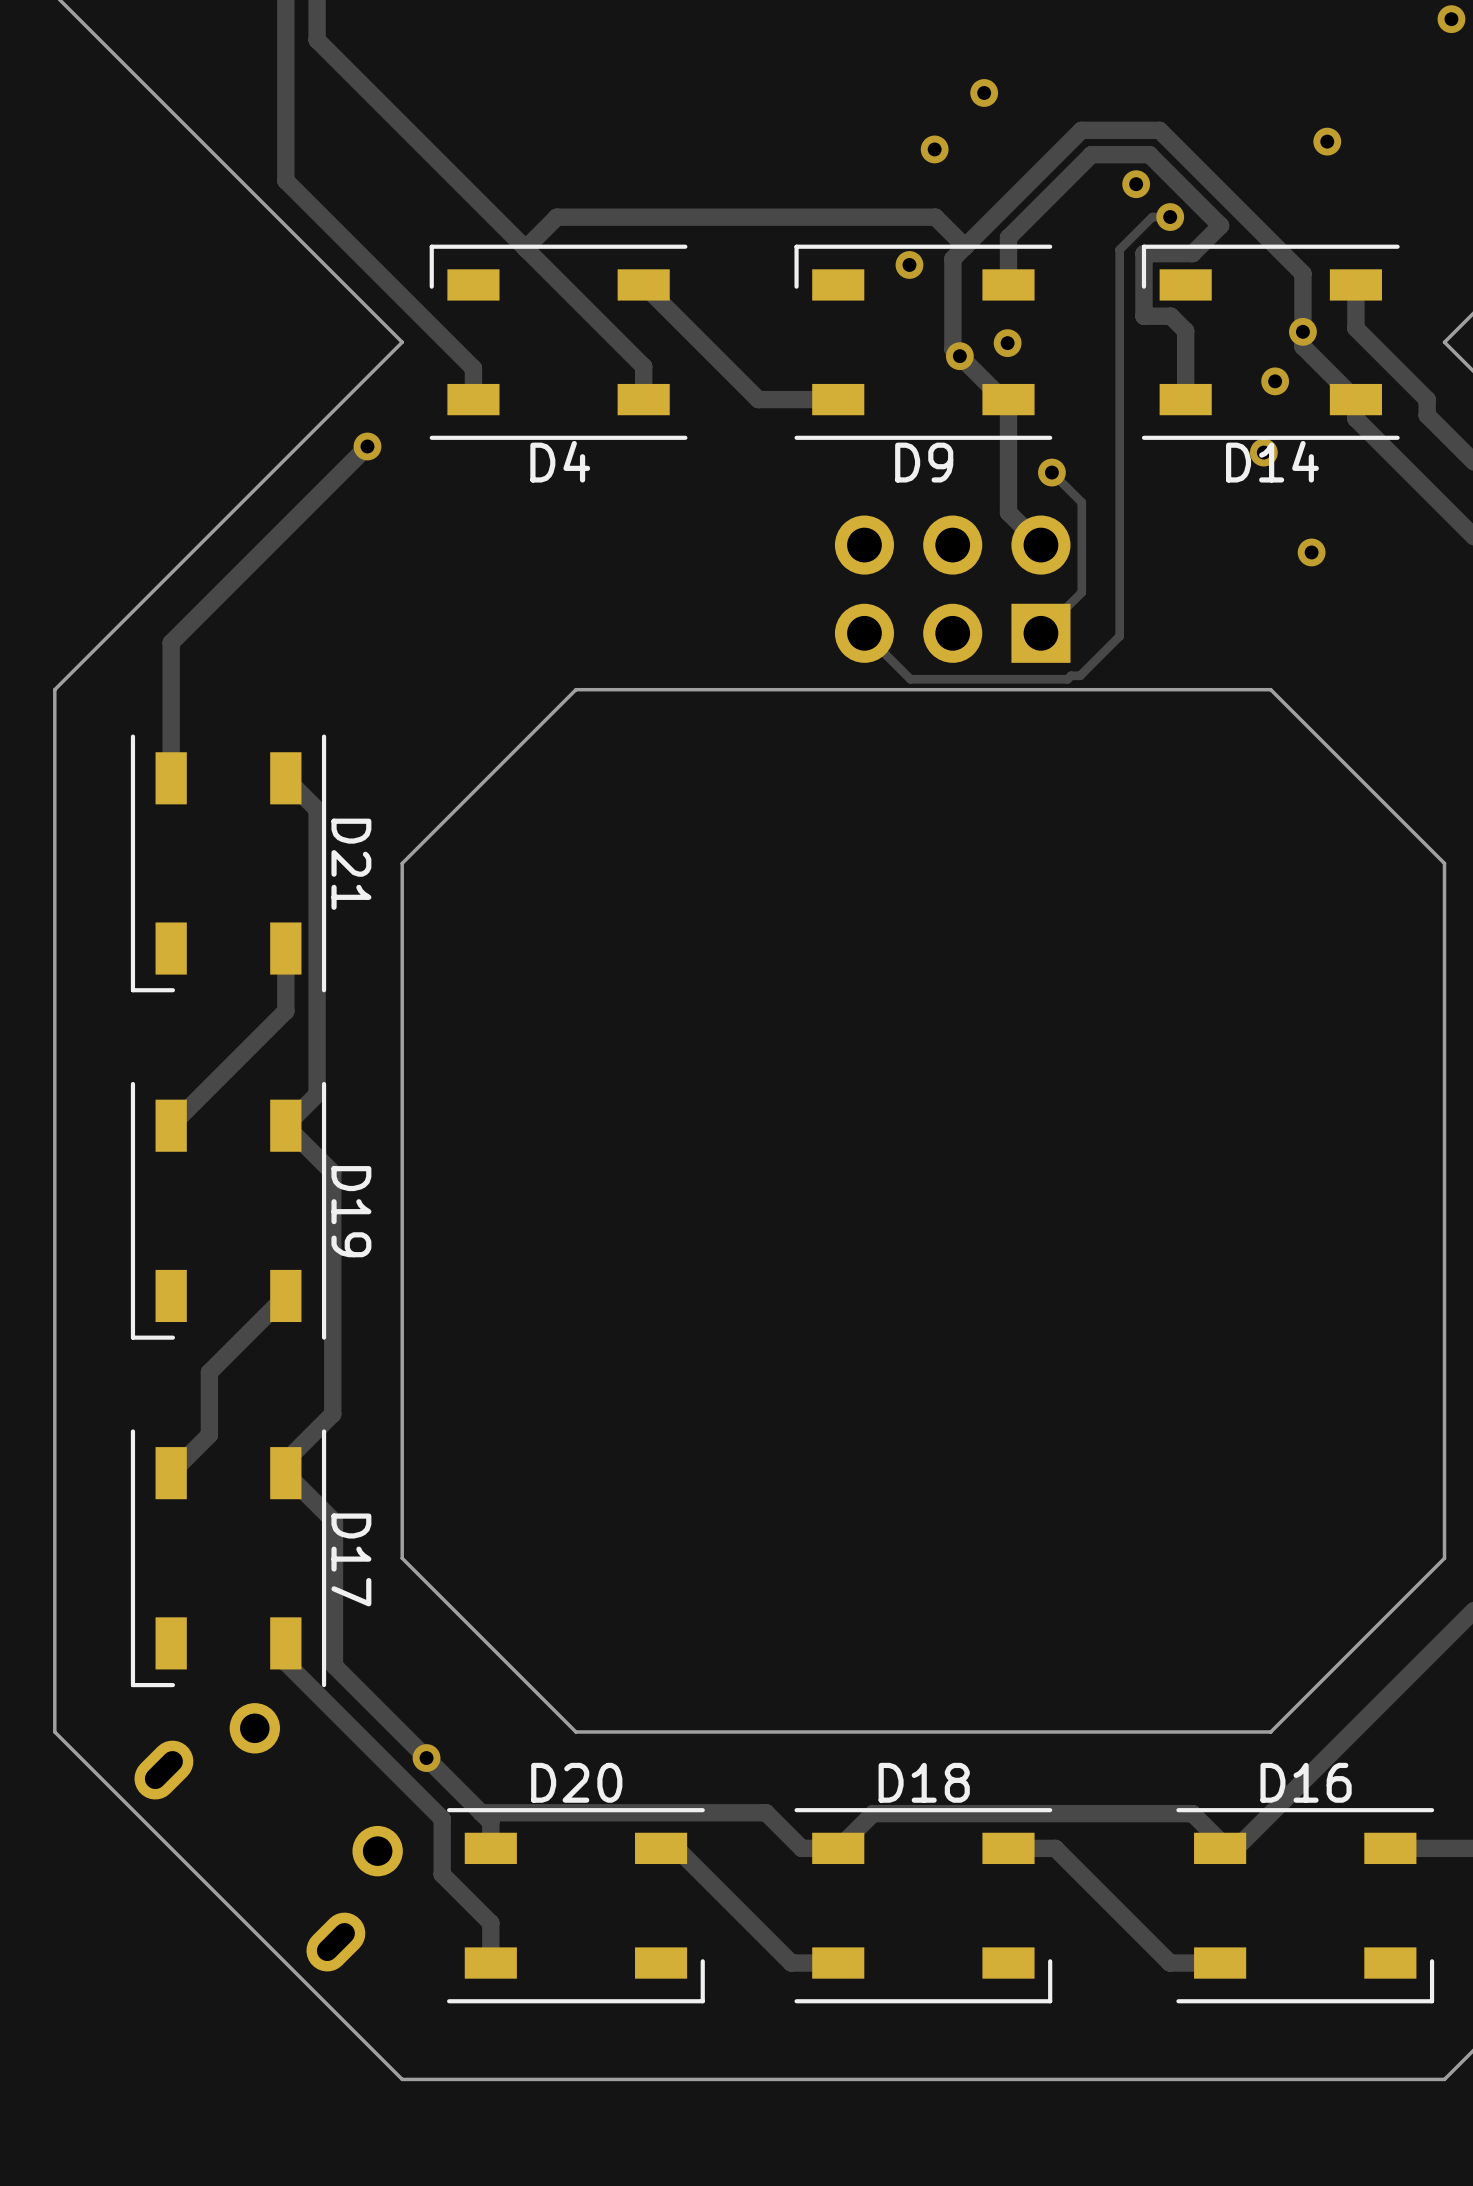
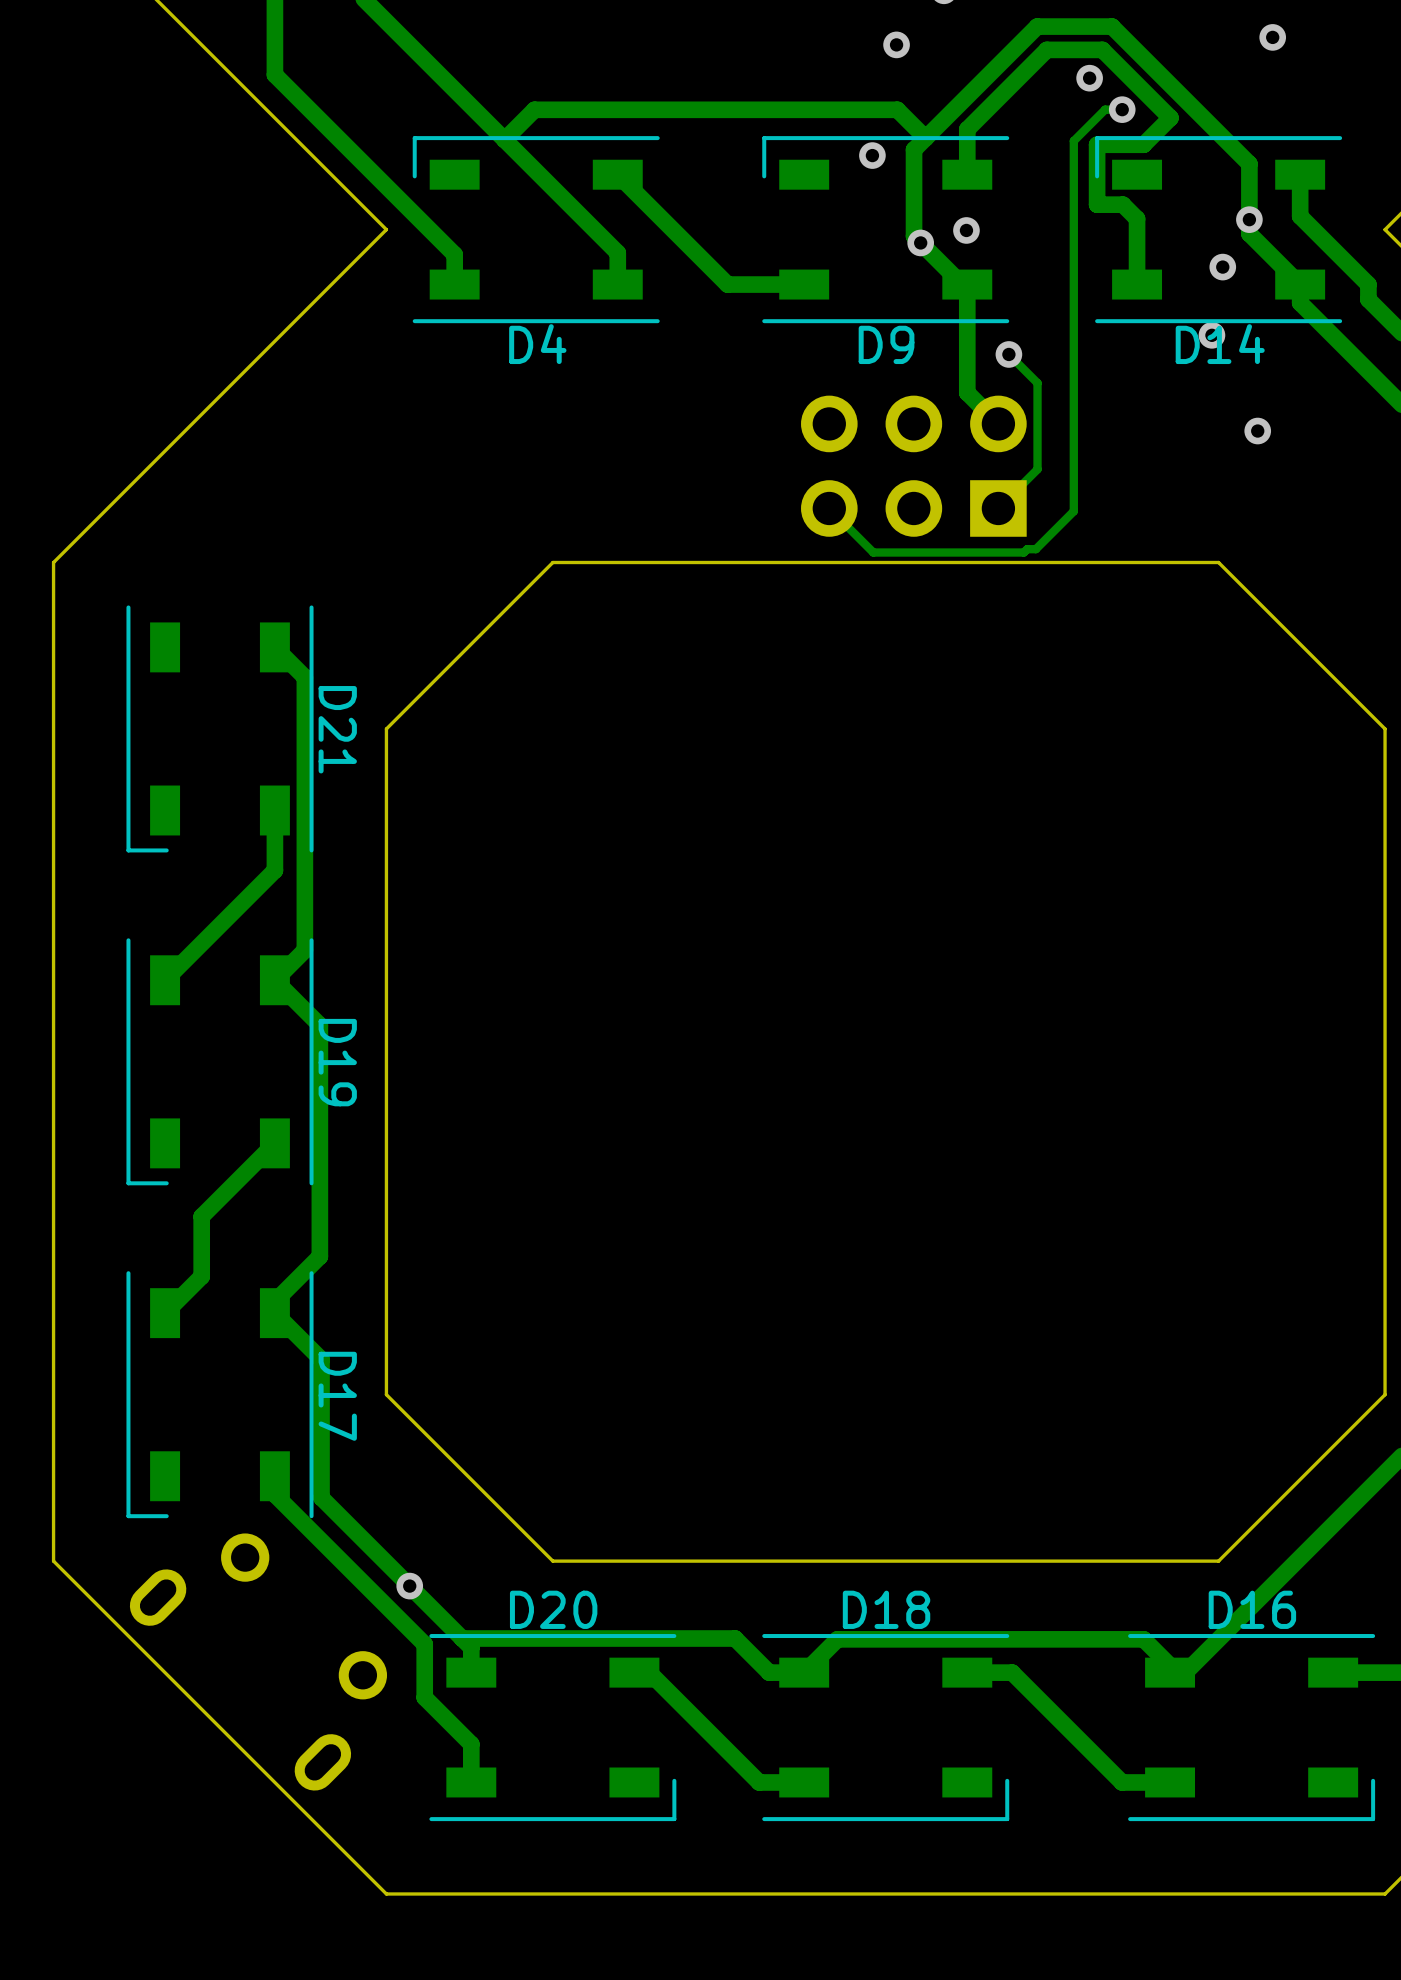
track: (367, 446) (171, 642) (171, 778) -> none
via: (367, 446) -> none

